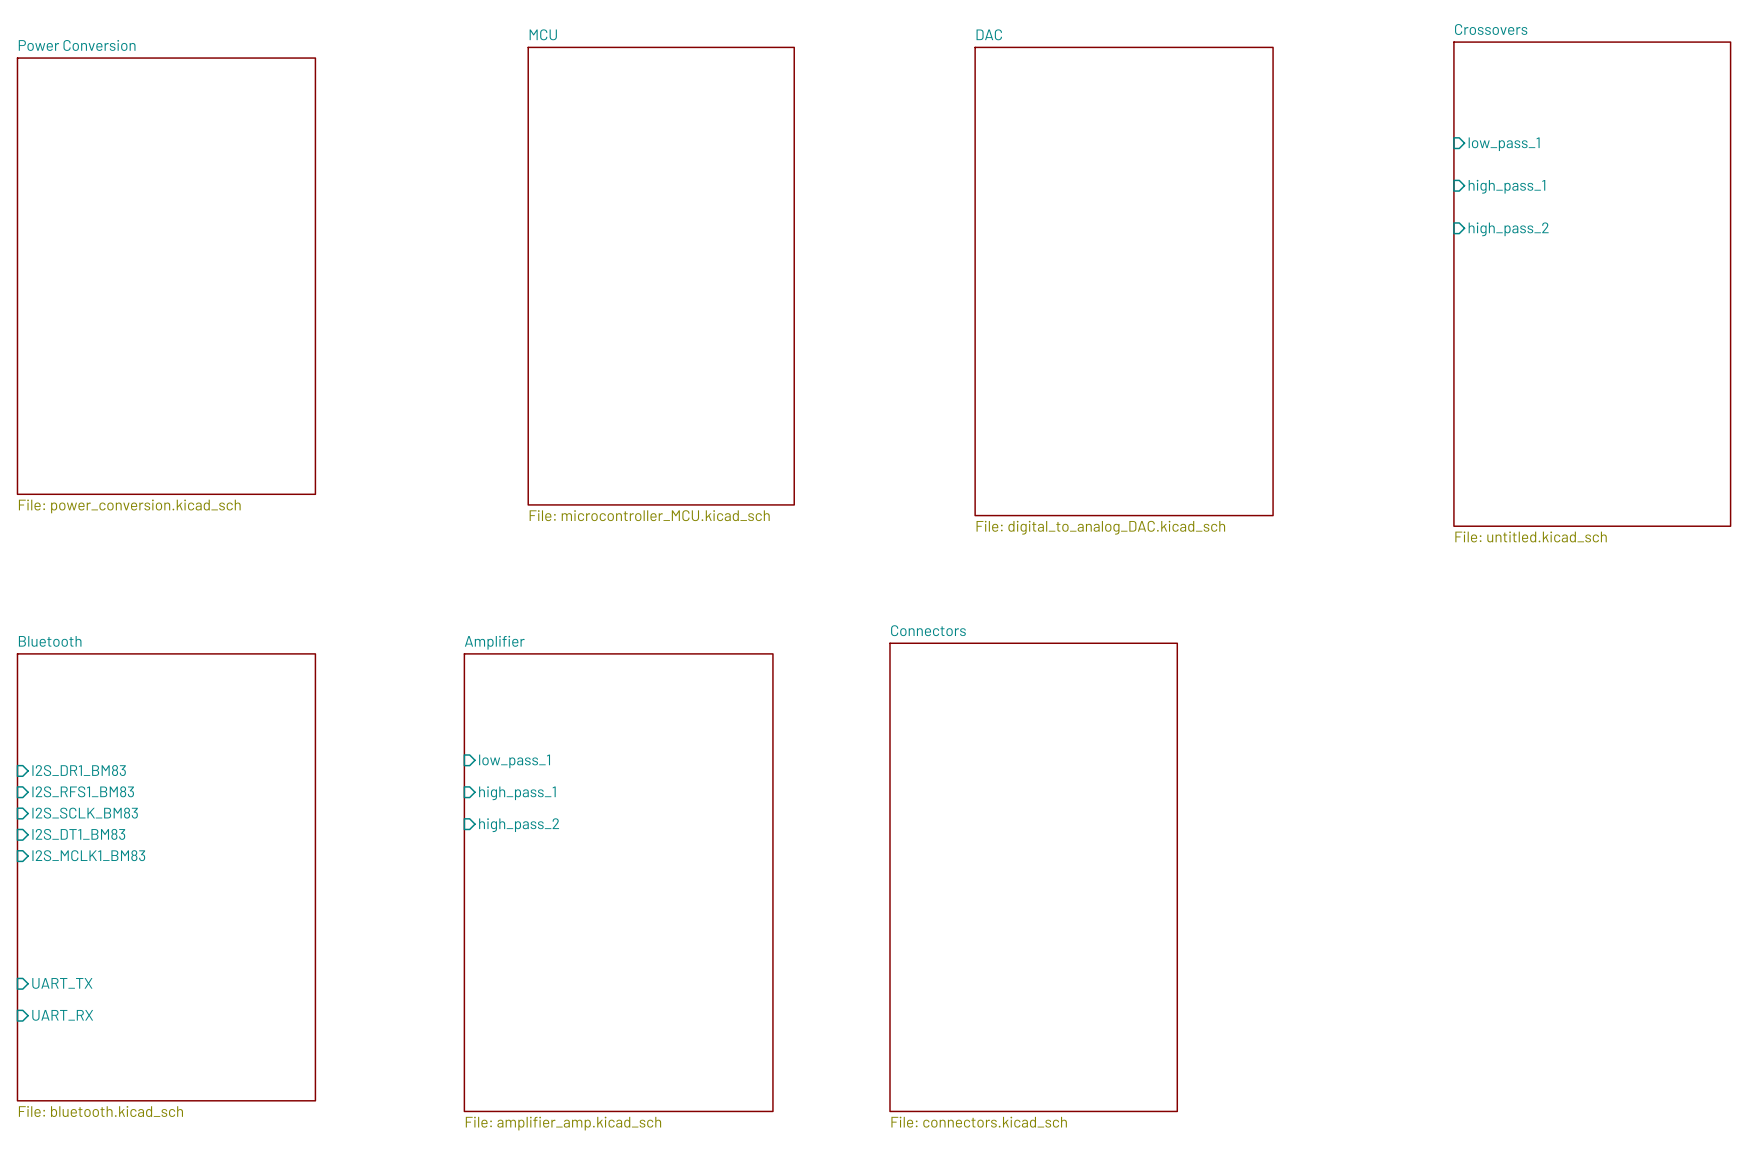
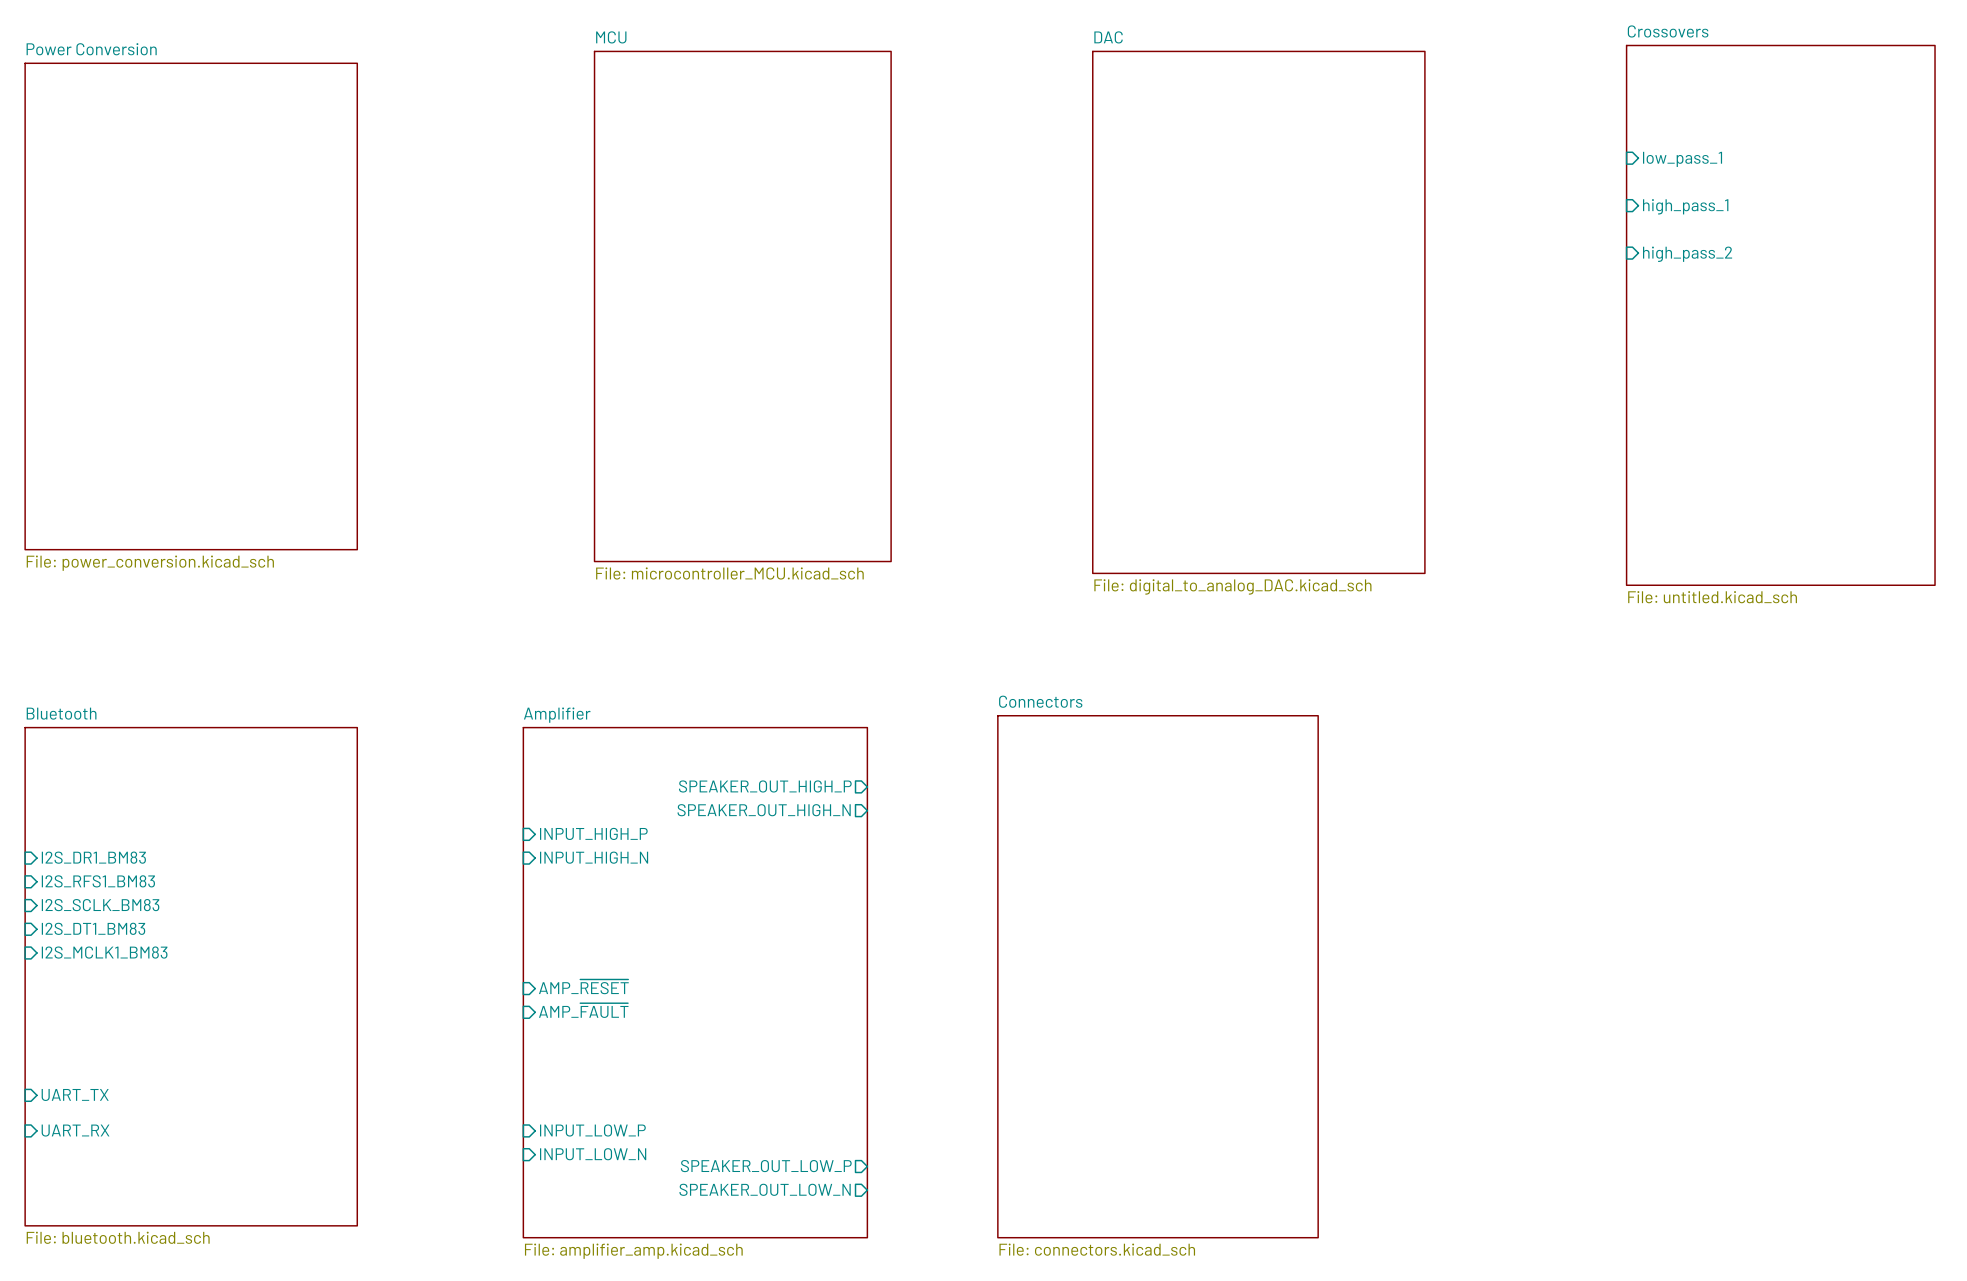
sheet pin: none -> SPEAKER_OUT_HIGH_P (765, 786)
sheet pin: none -> SPEAKER_OUT_HIGH_N (764, 810)
sheet pin: none -> INPUT_HIGH_P (593, 833)
sheet pin: low_pass_1 (514, 761) -> none
sheet pin: none -> INPUT_HIGH_N (594, 857)
sheet pin: high_pass_1 (517, 793) -> none
sheet pin: high_pass_2 (519, 825) -> none
sheet pin: none -> AMP_~{RESET} (583, 986)
sheet pin: none -> AMP_~{FAULT} (583, 1010)
sheet pin: none -> INPUT_LOW_P (592, 1130)
sheet pin: none -> INPUT_LOW_N (593, 1154)
sheet pin: none -> SPEAKER_OUT_LOW_P (766, 1166)
sheet pin: none -> SPEAKER_OUT_LOW_N (765, 1189)

